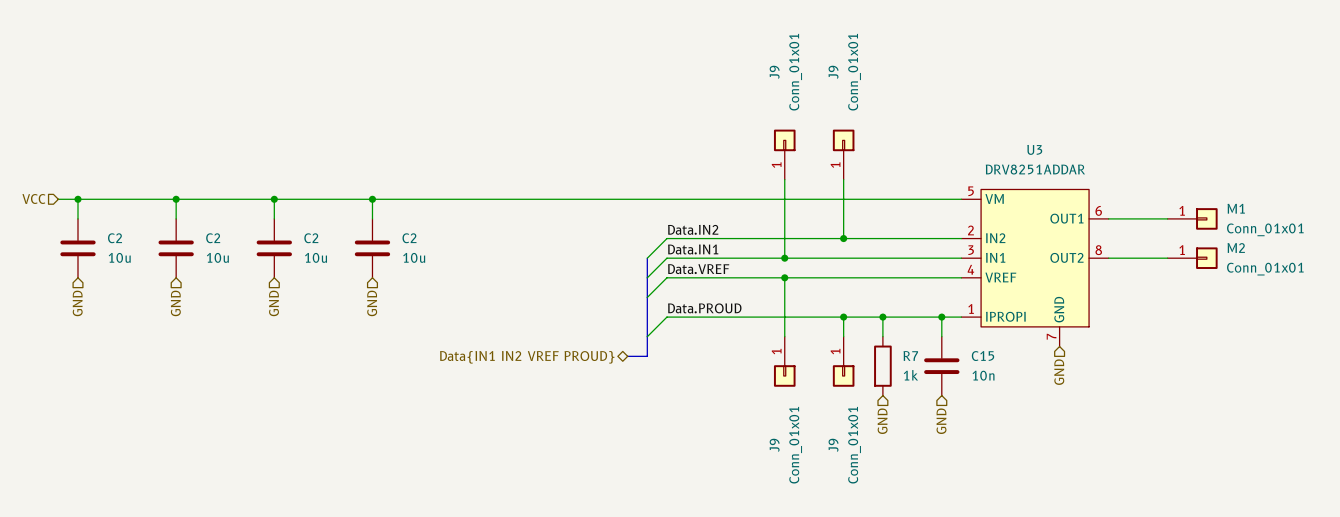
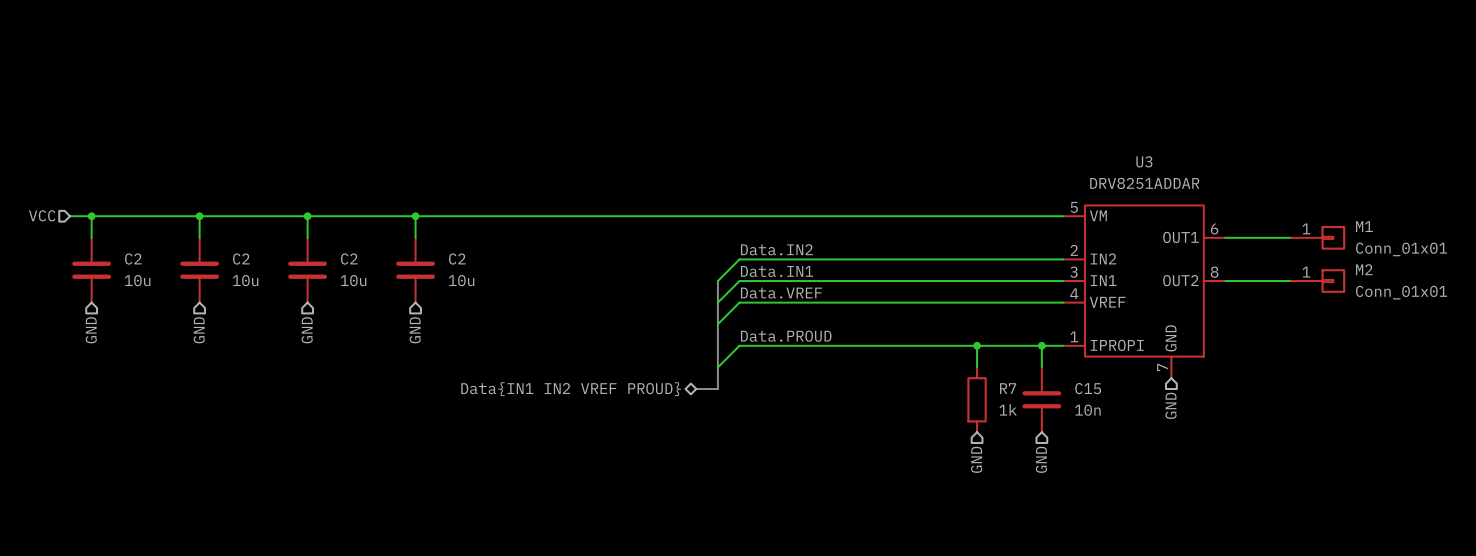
J9: Conn_01x01 (784, 154) -> none
J9: Conn_01x01 (843, 154) -> none
wire: (784, 179) (784, 258) -> none
wire: (843, 179) (843, 238) -> none
junction: (843, 238) -> none
junction: (784, 258) -> none
wire: (784, 277) (784, 336) -> none
junction: (784, 277) -> none
wire: (843, 317) (843, 336) -> none
junction: (843, 317) -> none
J9: Conn_01x01 (784, 361) -> none
J9: Conn_01x01 (843, 361) -> none

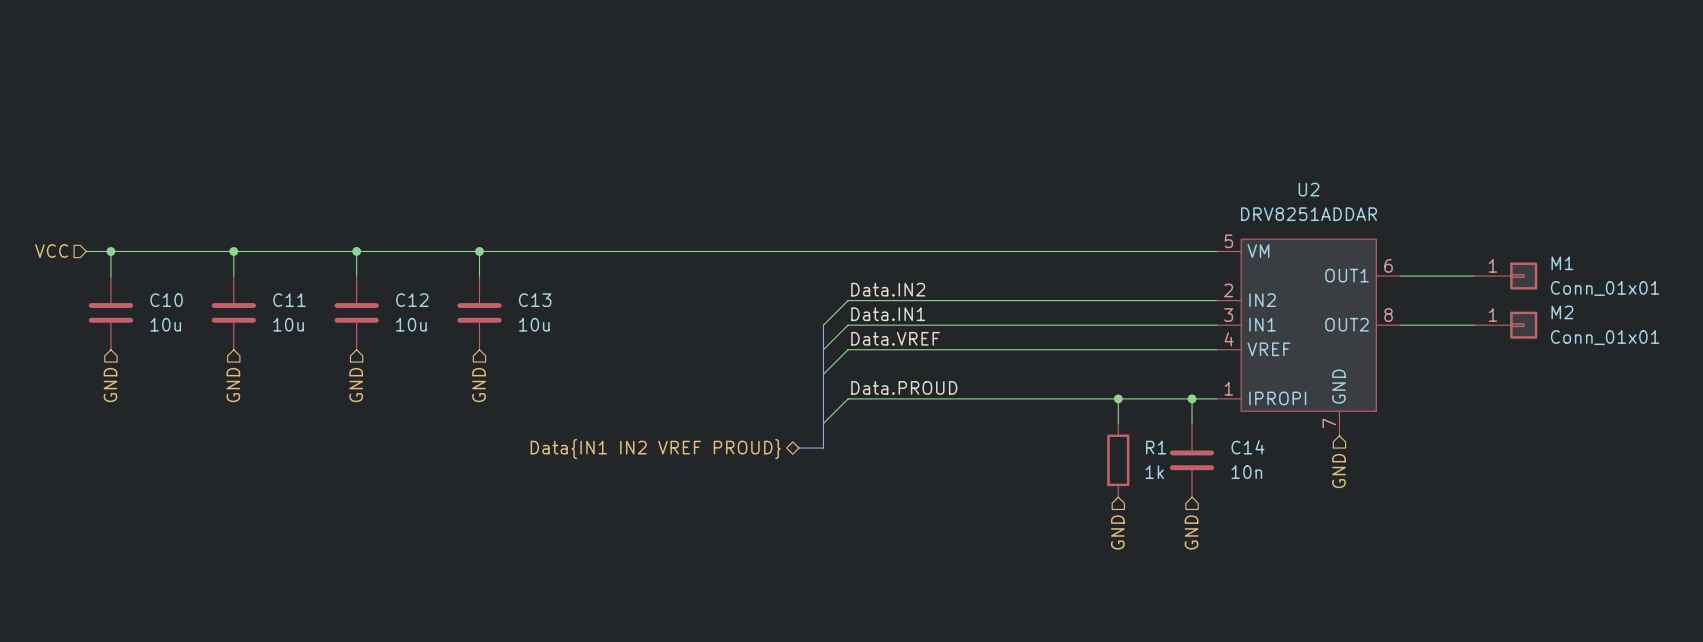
U3 name: U3 (1144, 161) -> U2 (1309, 189)
C2 name: C2 (133, 259) -> C10 (166, 300)
C2 name: C2 (241, 259) -> C11 (289, 300)
C2 name: C2 (349, 259) -> C12 (412, 300)
C2 name: C2 (457, 259) -> C13 (535, 300)
R7 name: R7 (1008, 388) -> R1 (1156, 447)
C15 name: C15 (1088, 388) -> C14 (1247, 447)

